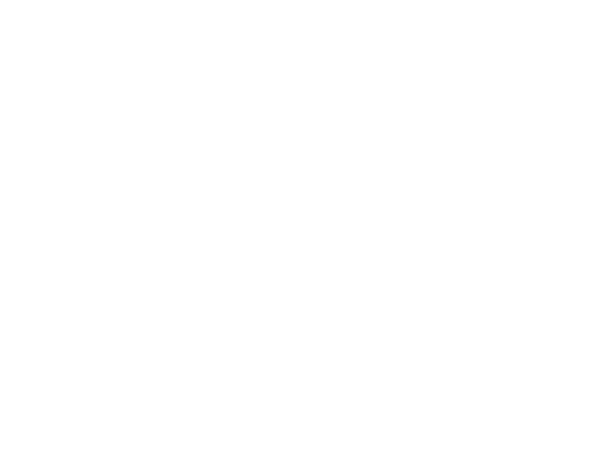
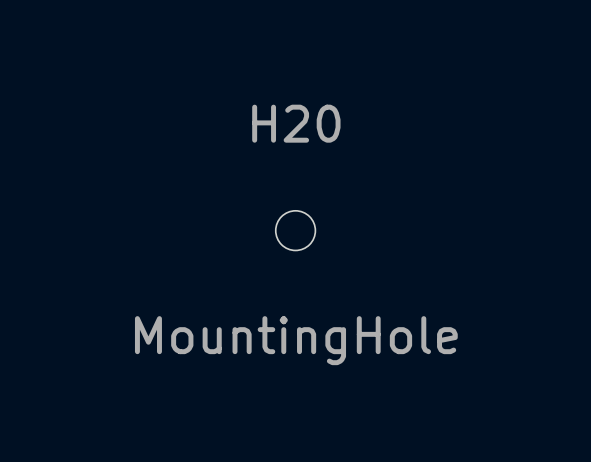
H20: none -> MountingHole (295, 230)

